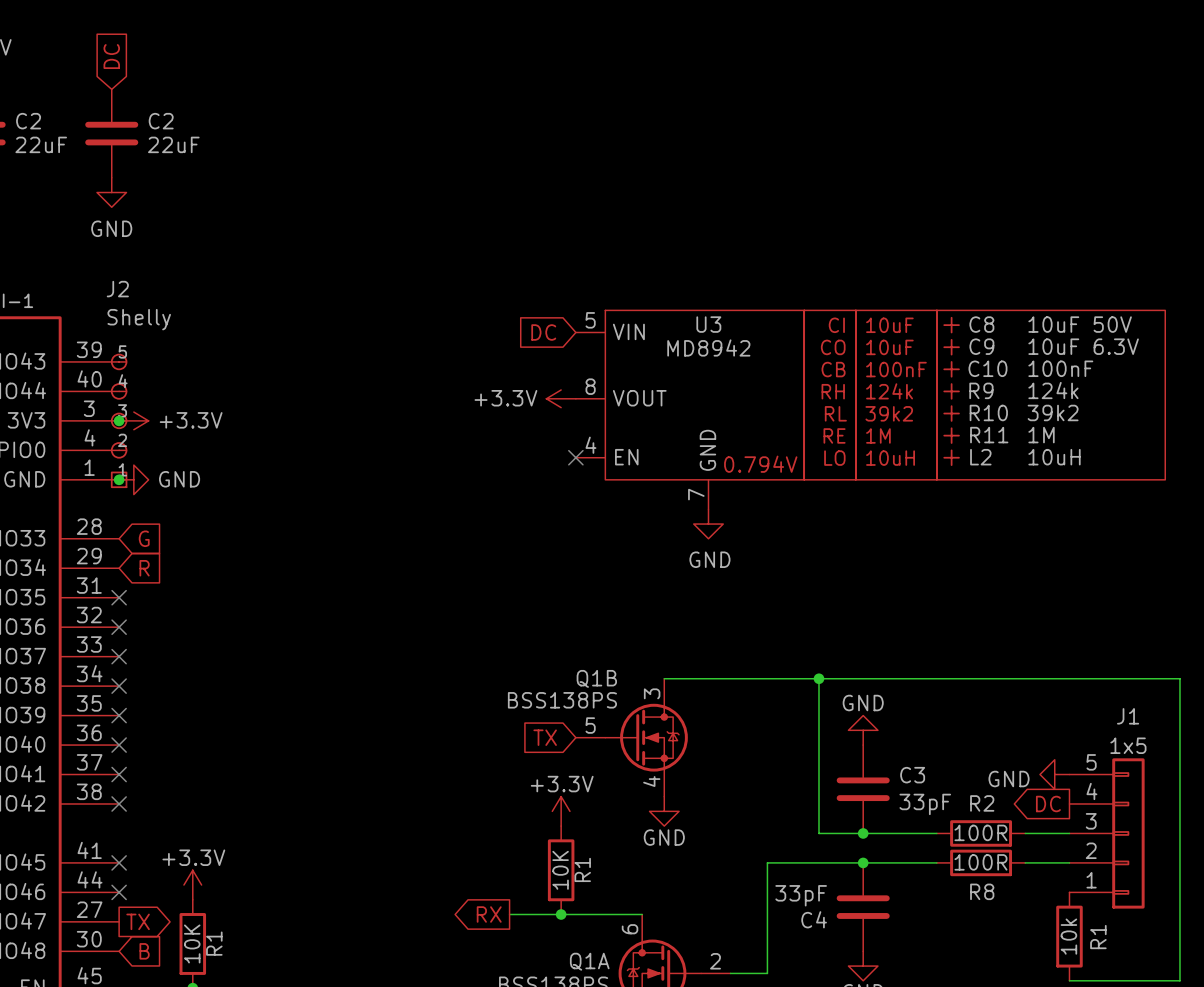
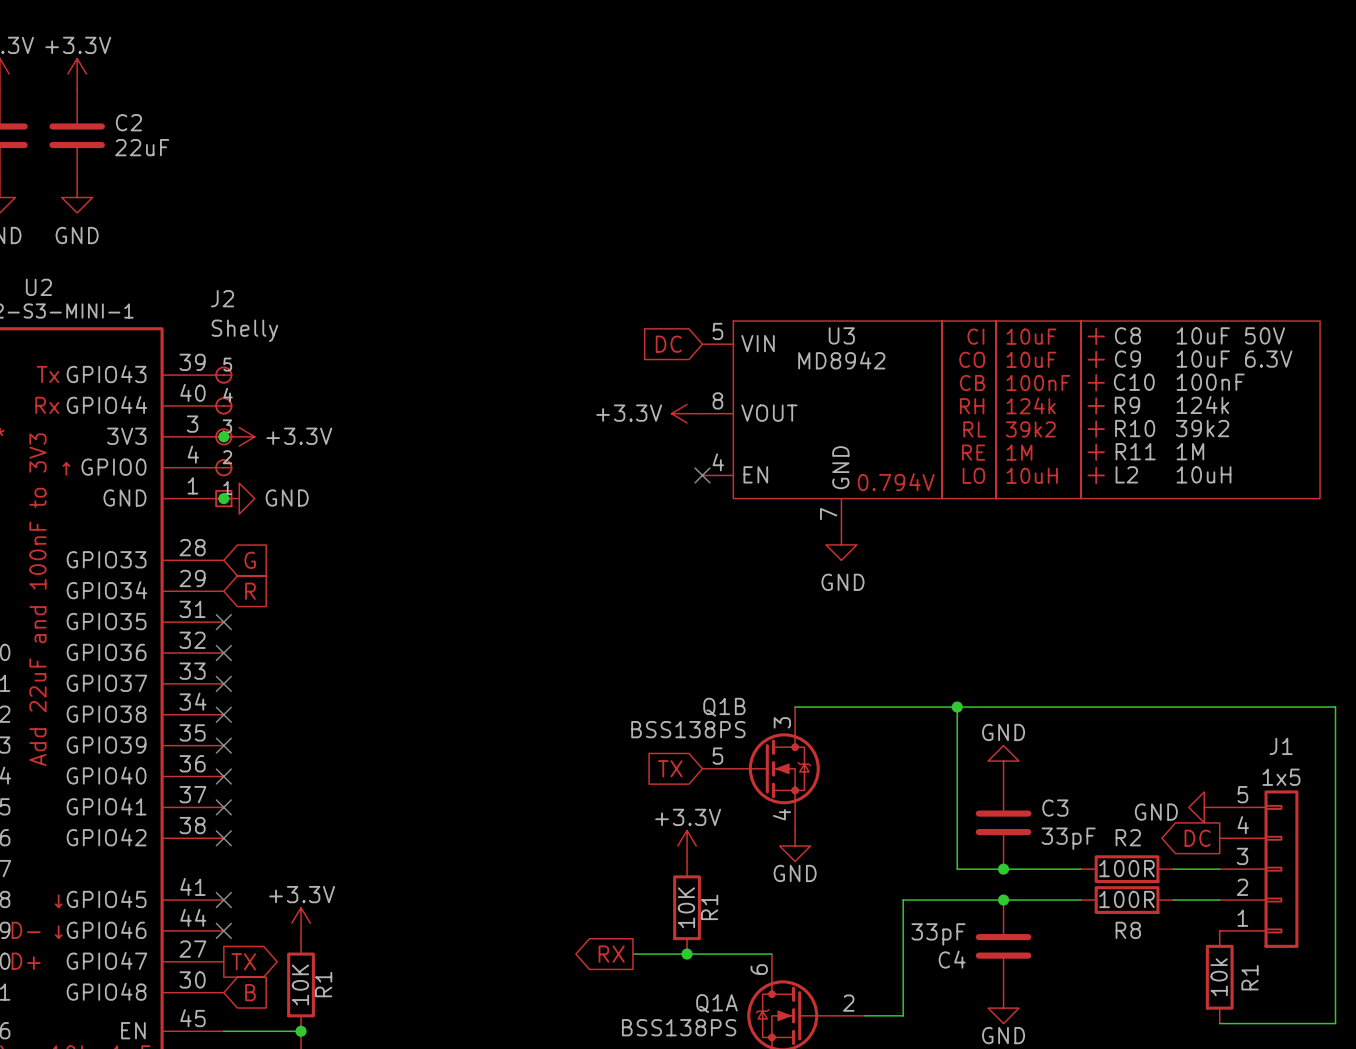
global label: DC (111, 56) -> none
C2: 22uF (111, 133) -> none
power symbol: GND (111, 192) -> none

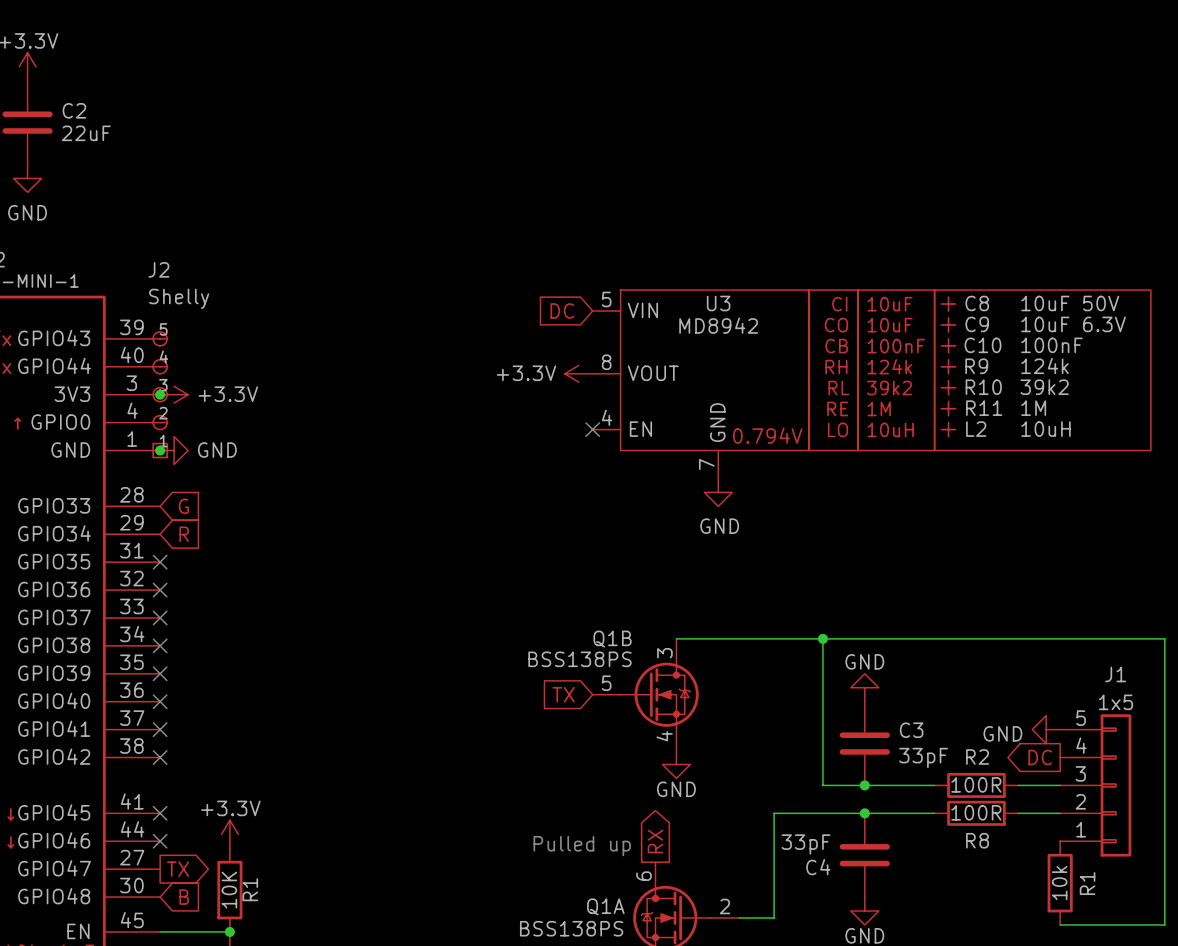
power symbol: +3.3V (687, 846) -> none
R1: 10K (687, 907) -> none
text: none -> Pulled up (582, 846)
global label rotation: 0° (611, 954) -> 90° clockwise (655, 841)
global label position: RX (611, 954) -> RX (655, 841)
wire: (632, 954) (771, 954) -> none
junction: (687, 954) -> none

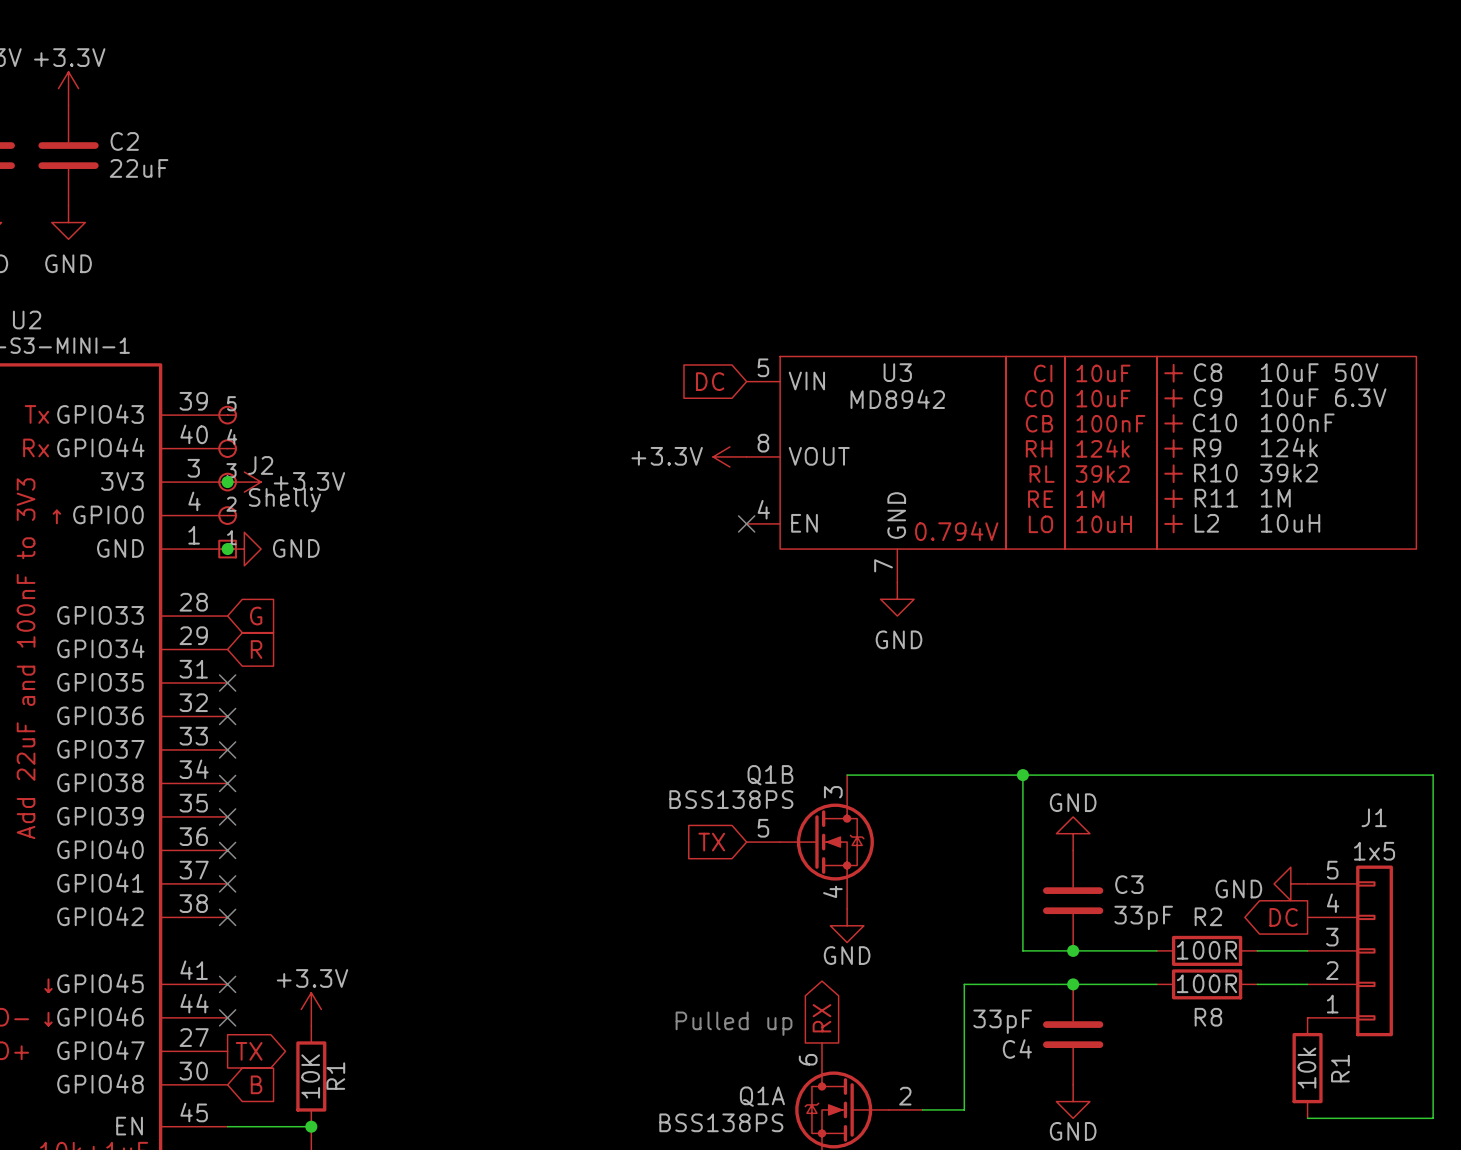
J2 name position: J2 (158, 269) -> J2 (260, 465)
J2 value position: Shelly (179, 298) -> Shelly (284, 500)

